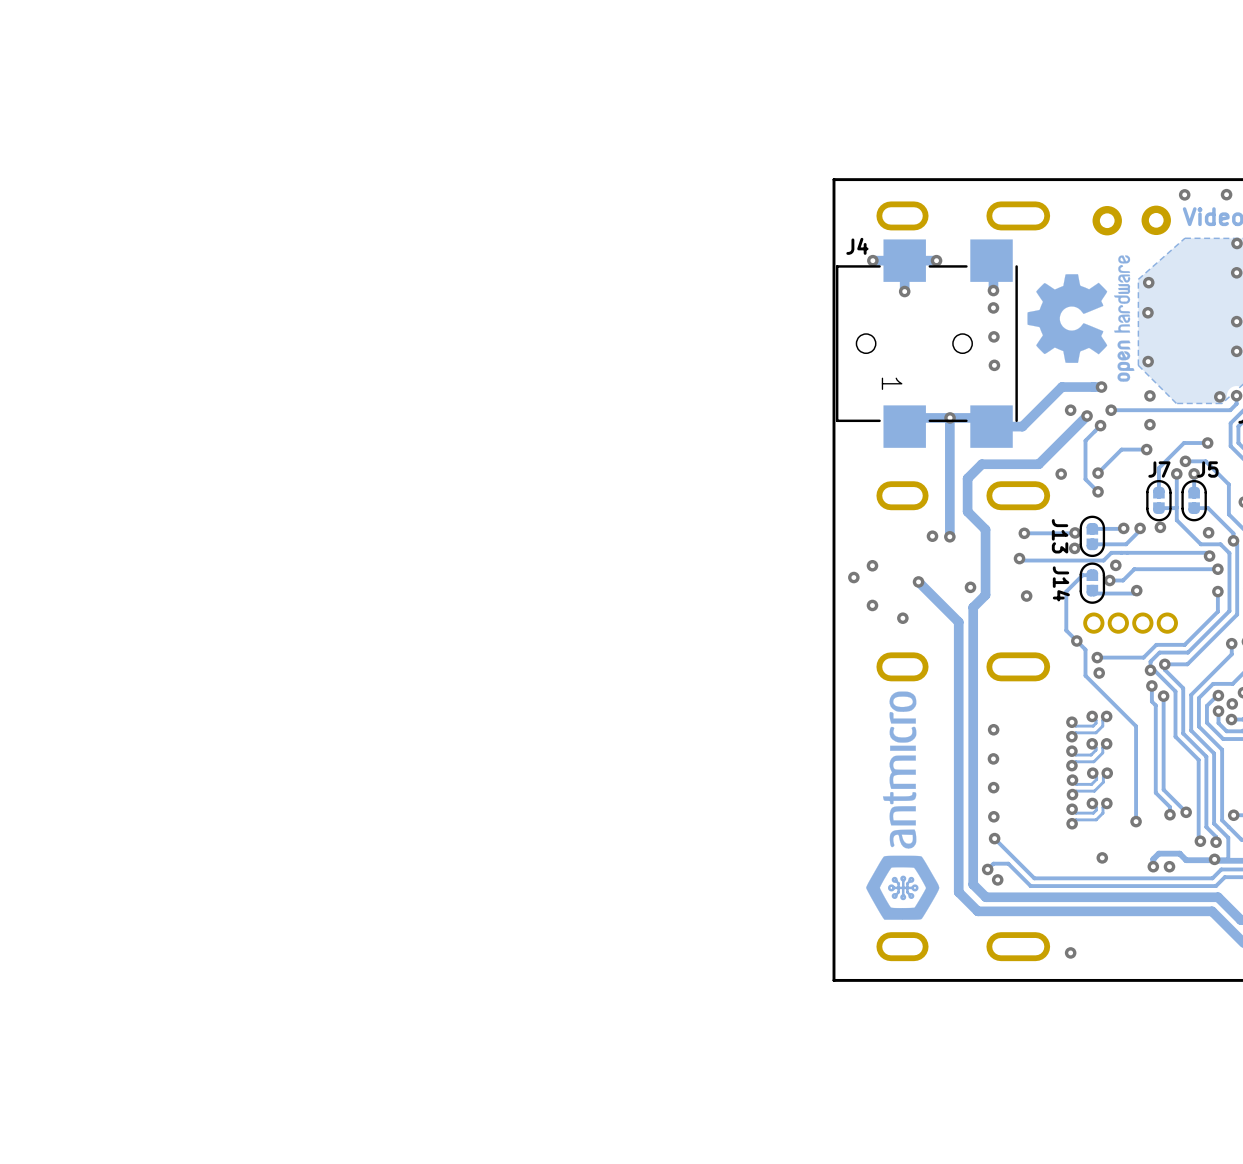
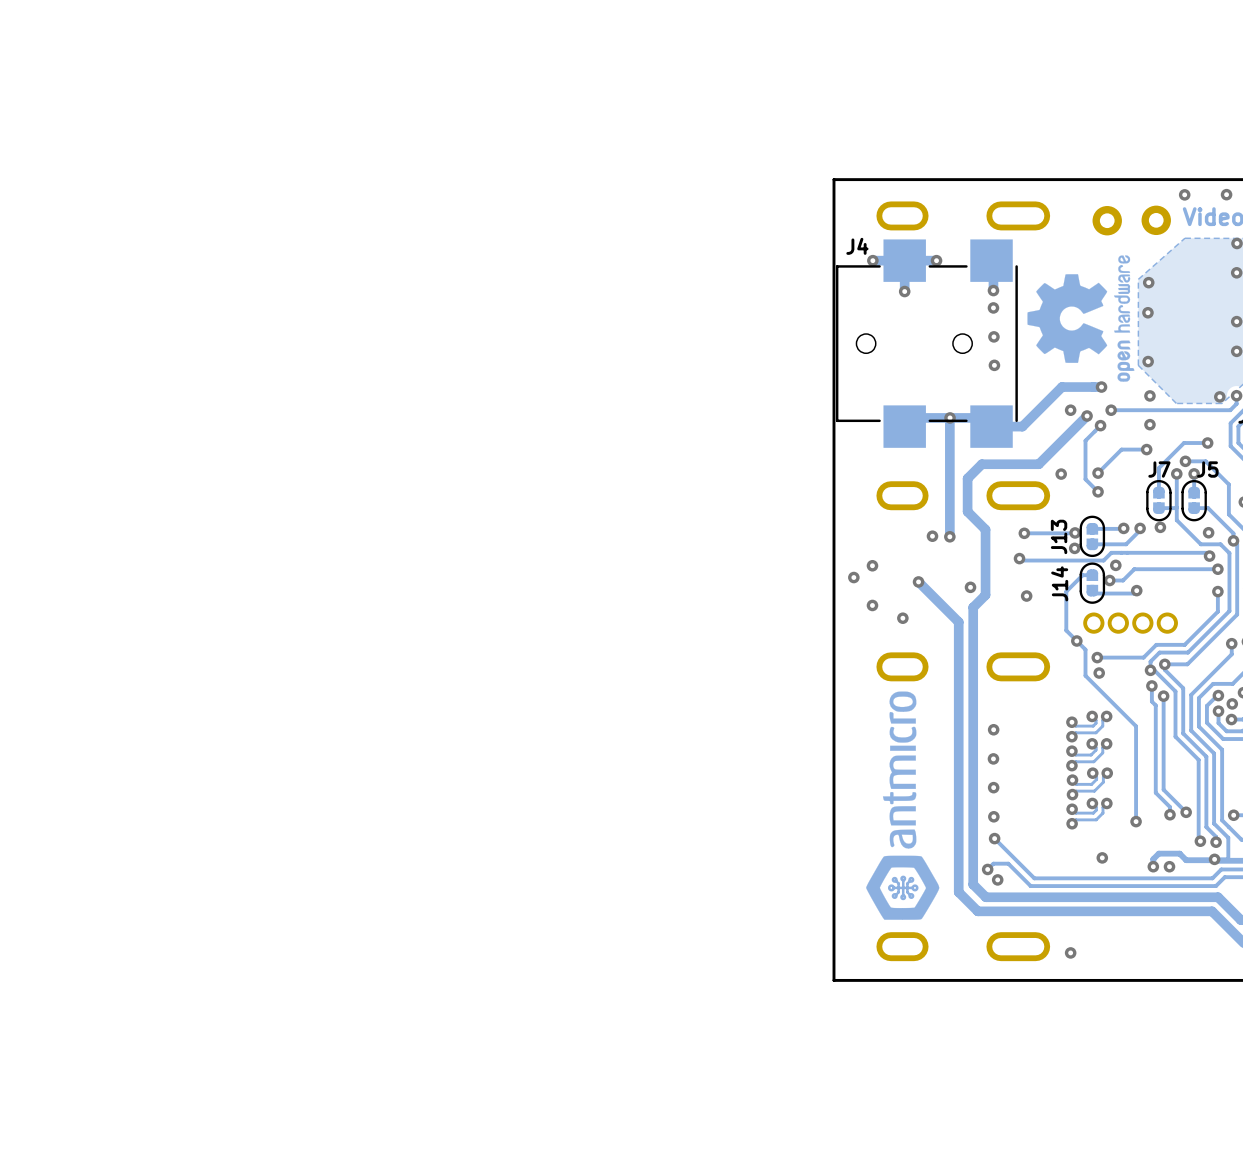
J4 text: 1 (892, 383) -> none
J13 name rotation: 0° (1060, 536) -> 180° (1059, 536)
J14 name rotation: 0° (1061, 583) -> 180° (1059, 583)

